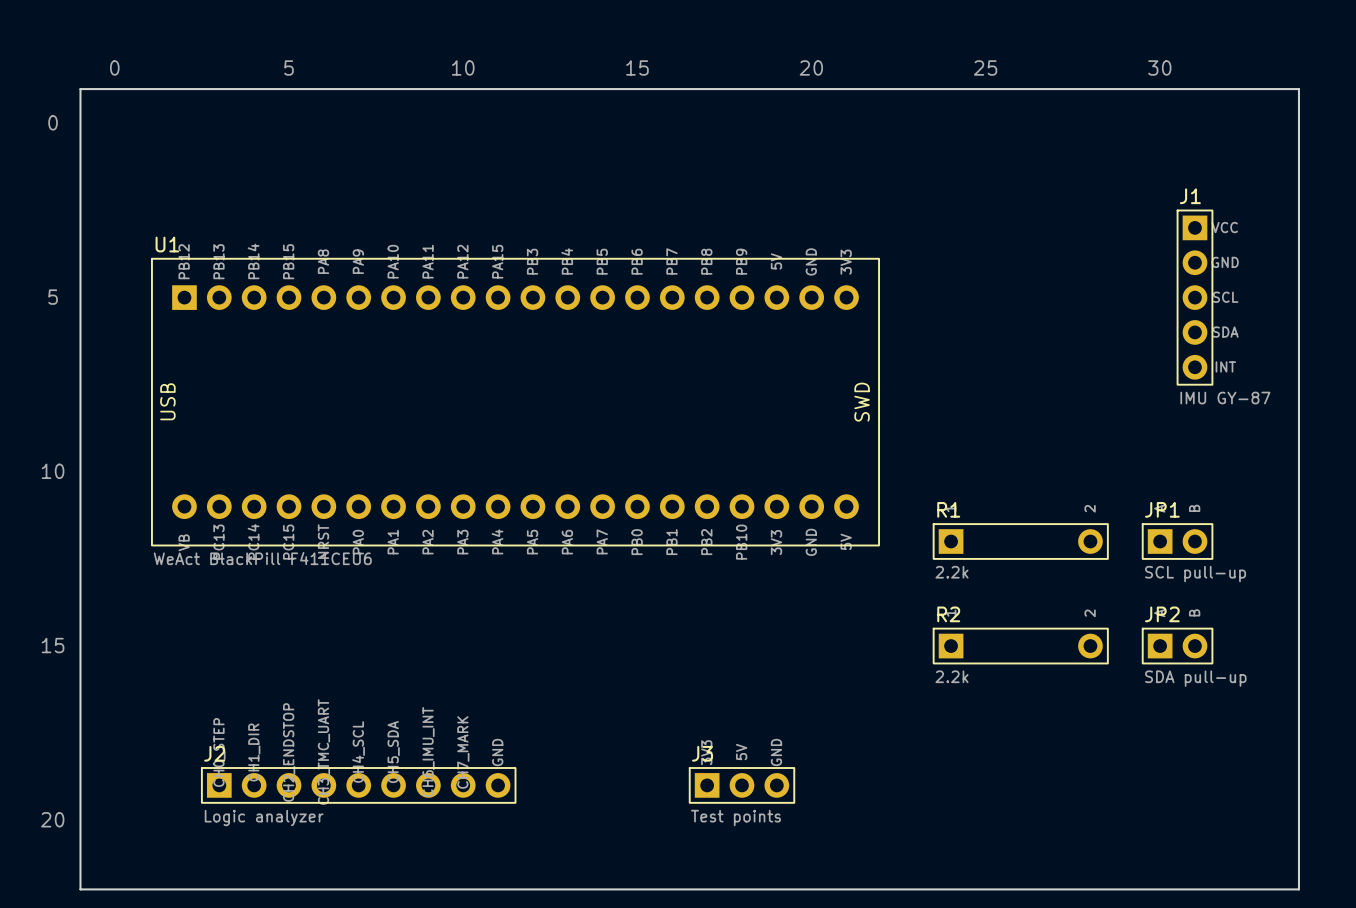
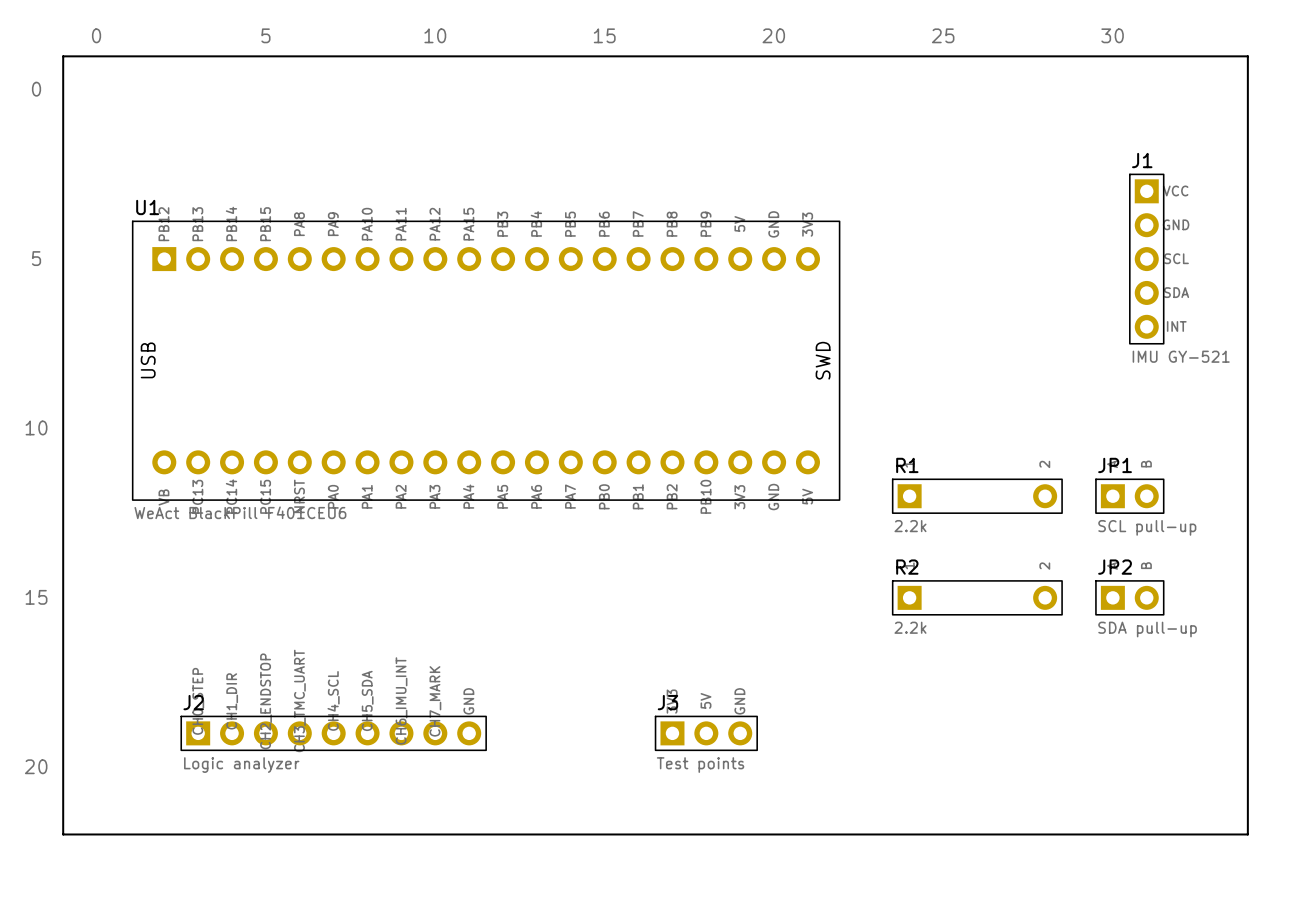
J1 value: IMU GY-87 (1225, 398) -> IMU GY-521 (1181, 356)
U1 value: WeAct BlackPill F411CEU6 (262, 558) -> WeAct BlackPill F401CEU6 (240, 512)

